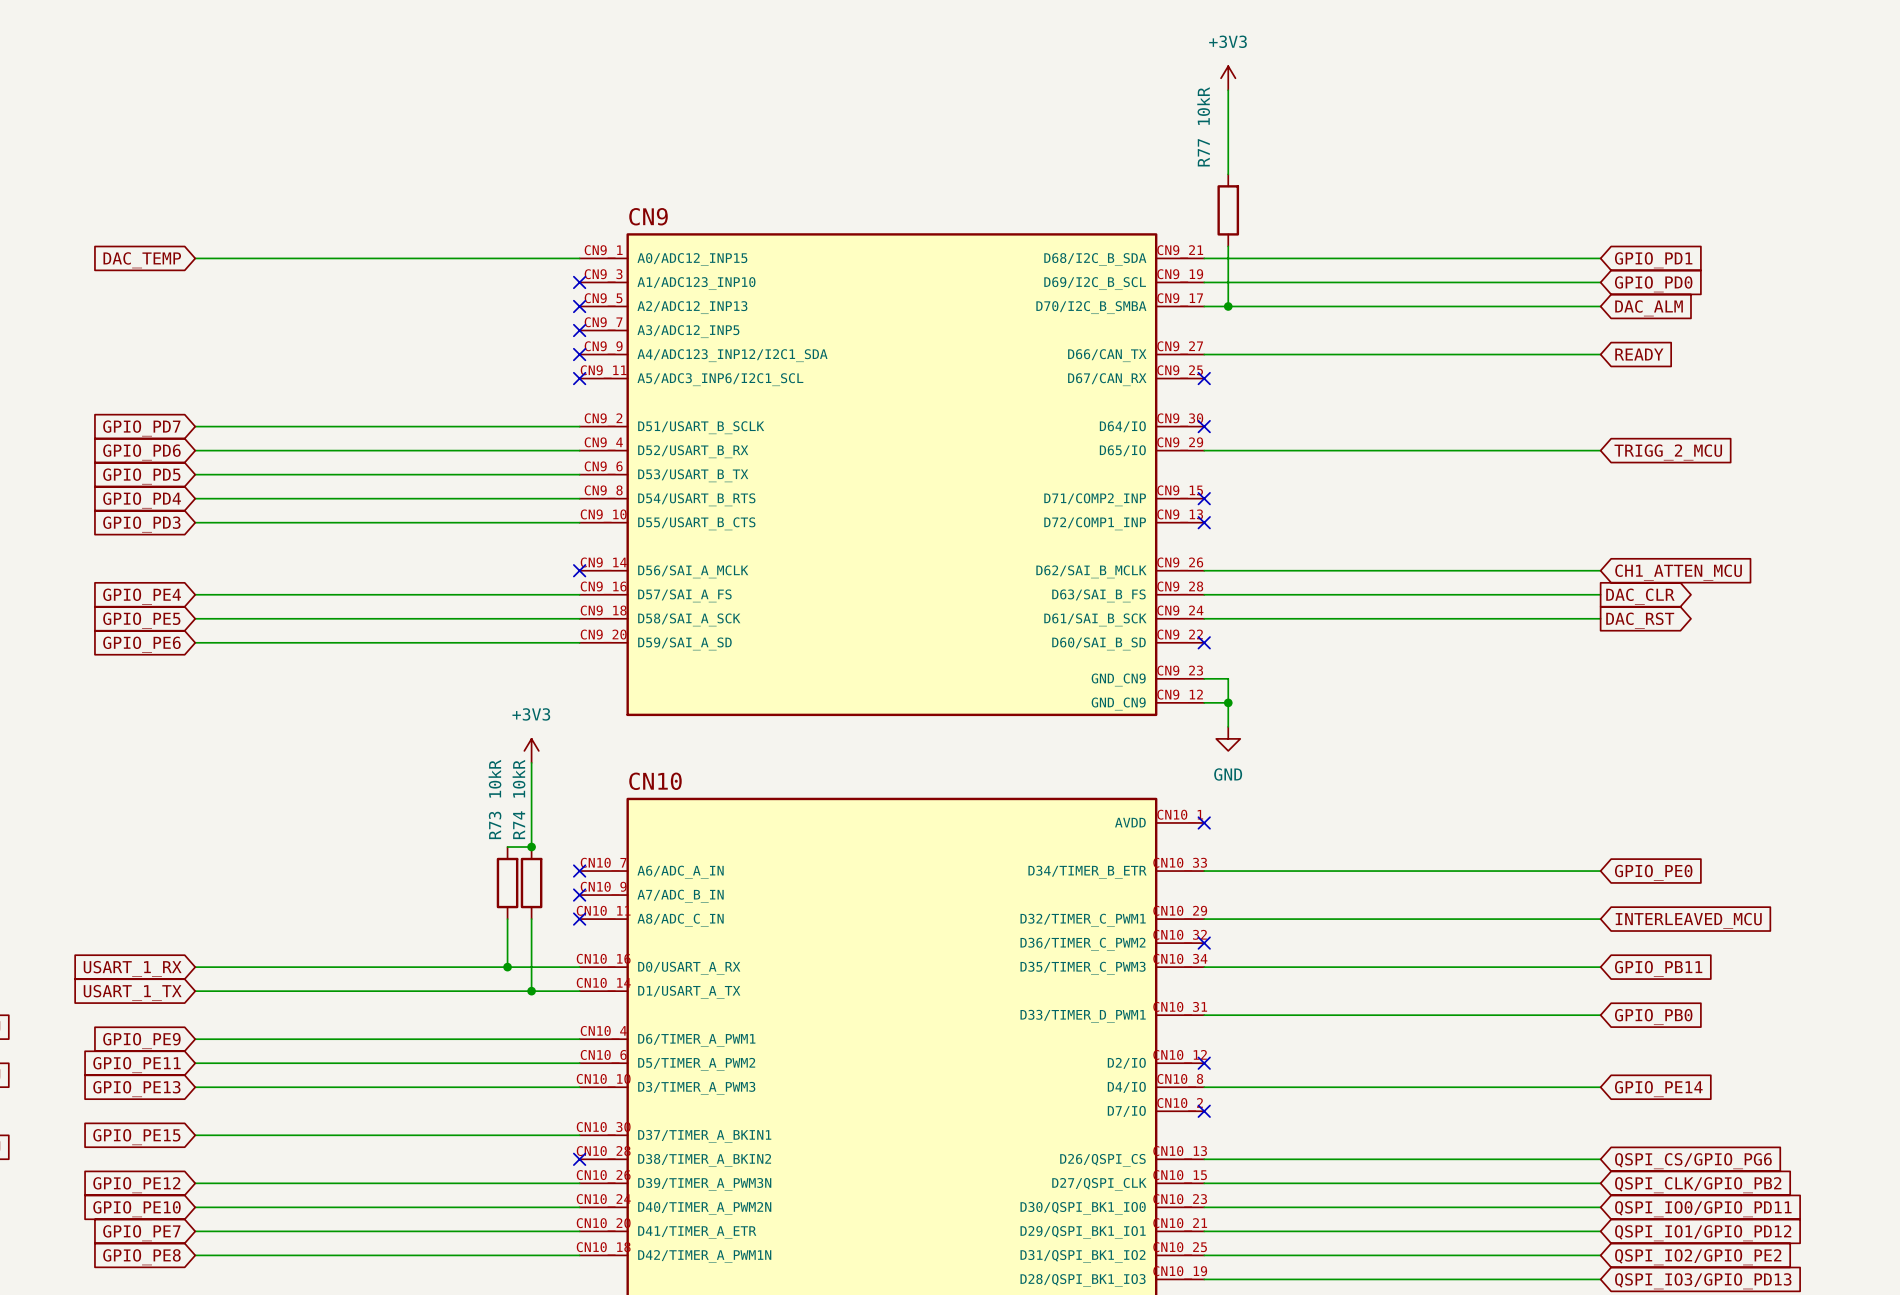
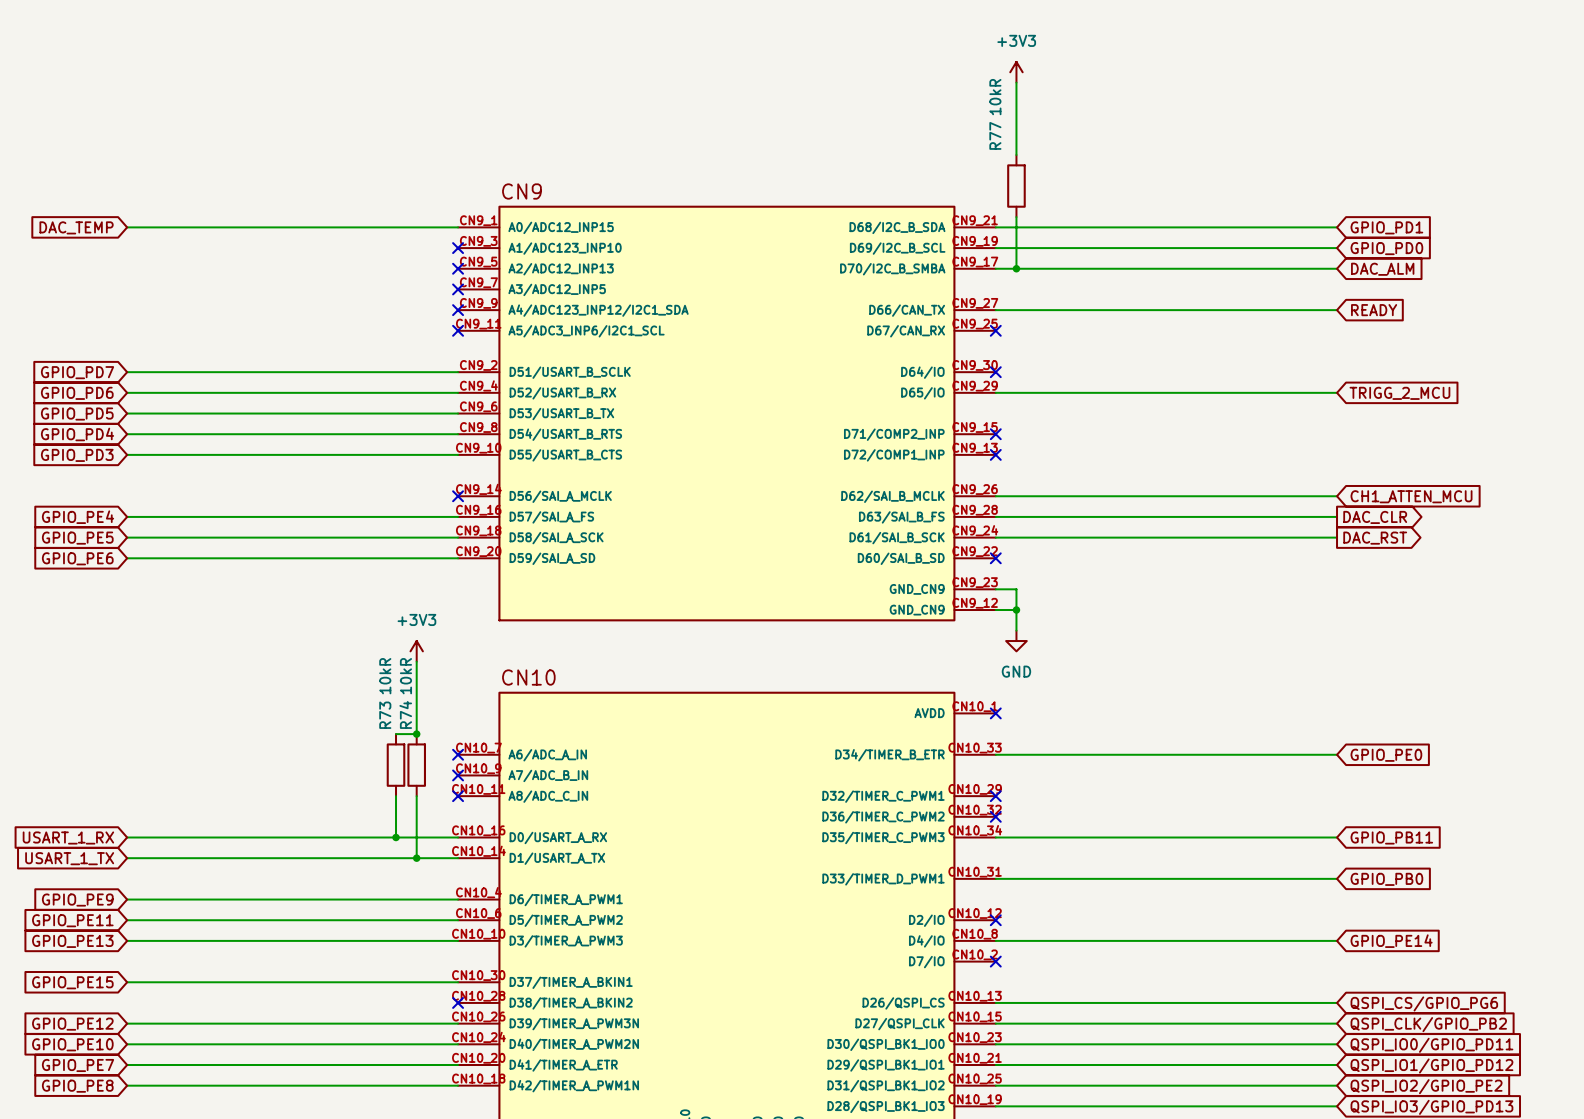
wire: (1204, 919) (1600, 919) -> none
no-connect mark: none -> (995, 796)
global label: INTERLEAVED_MCU (1688, 920) -> none

